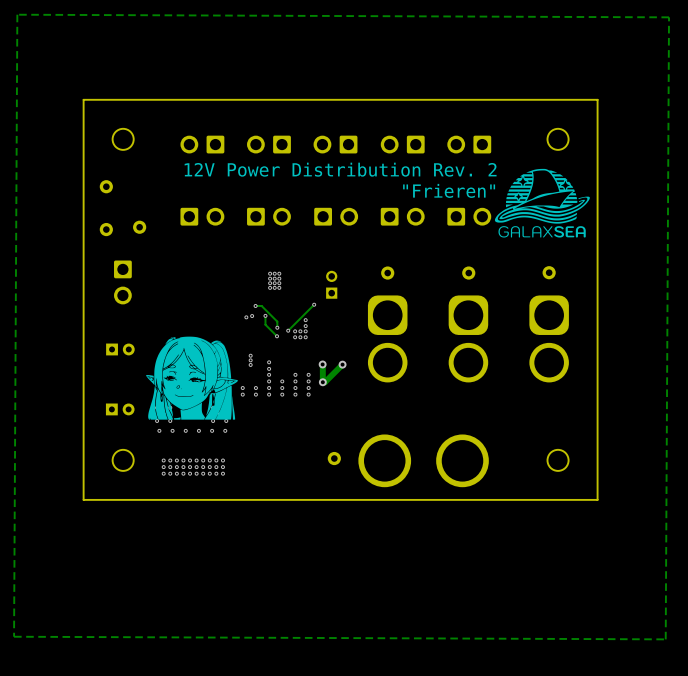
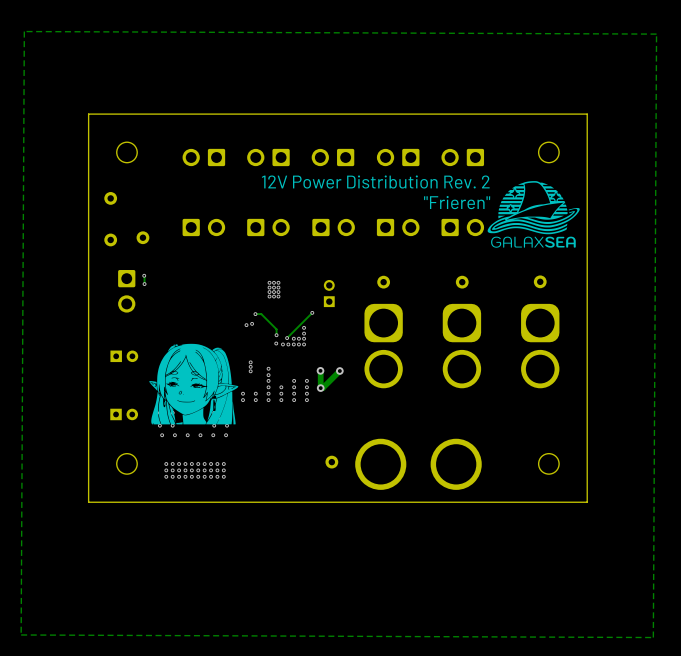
track: none -> (144, 275) (144, 284)
via: none -> (144, 275)
via: none -> (144, 284)
track: (265, 315) (265, 324) (277, 336) -> none
via: (265, 315) -> none
via: none -> (282, 344)
via: none -> (288, 344)

